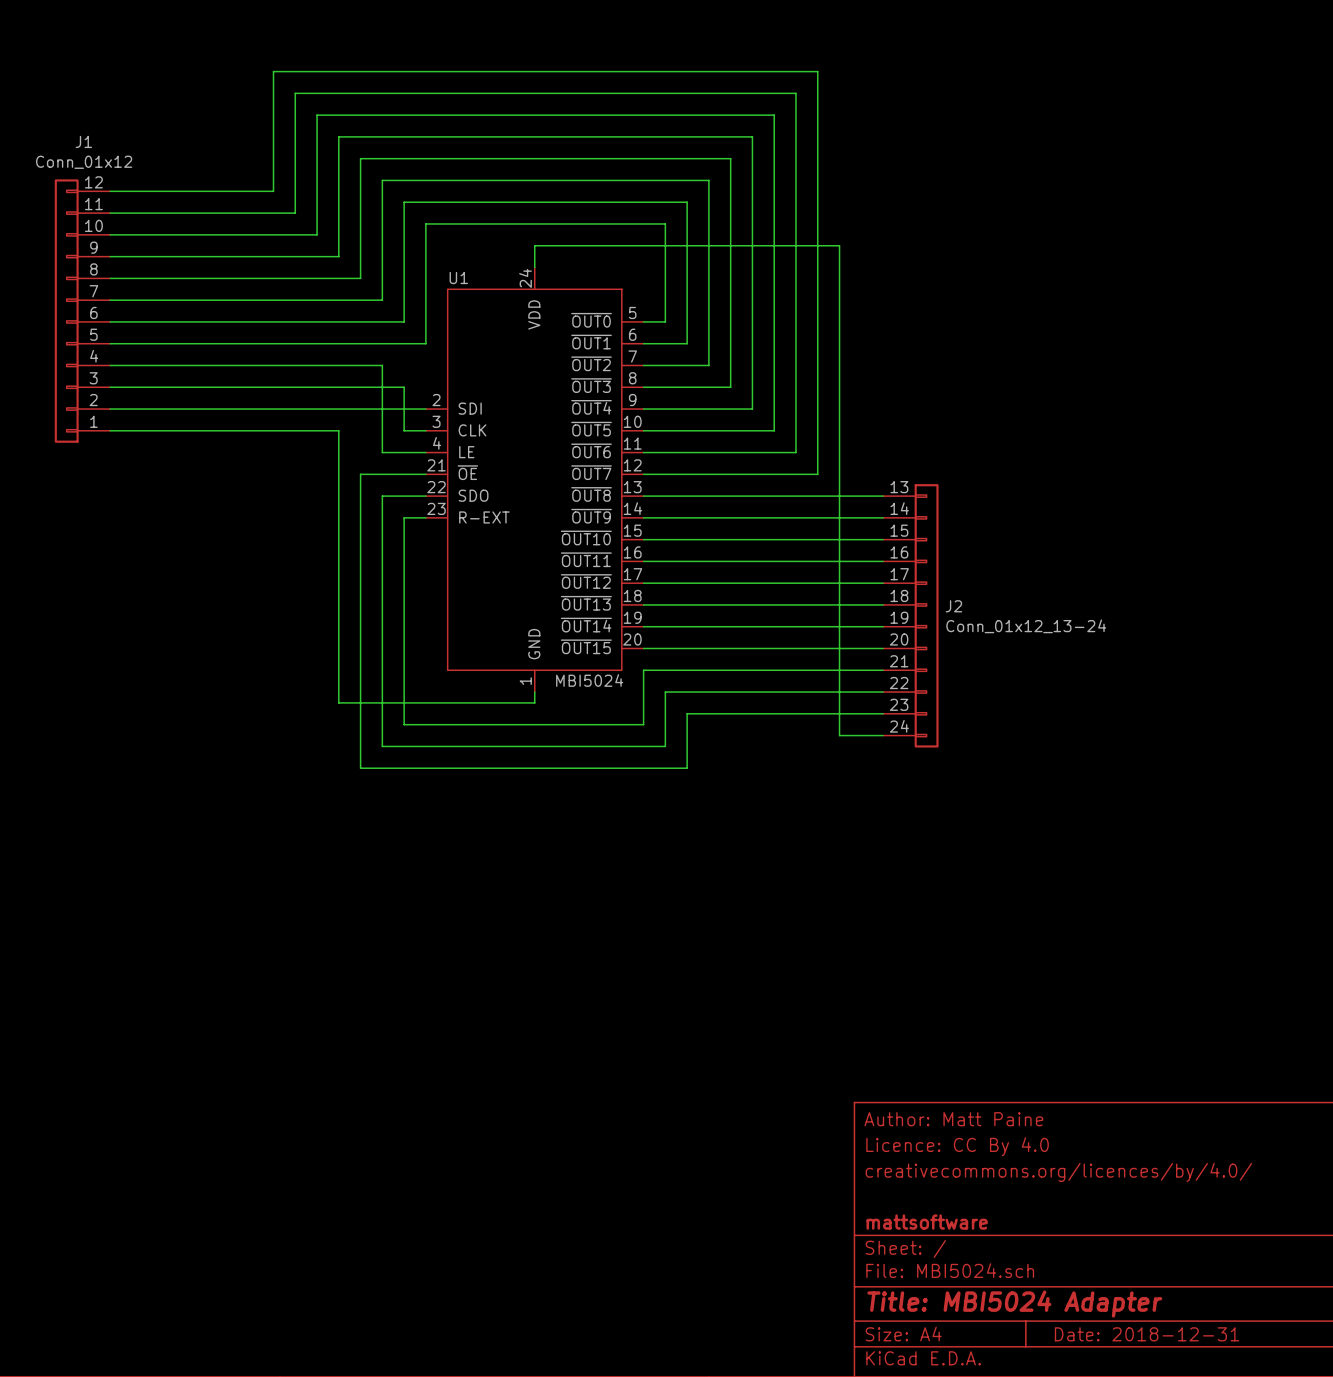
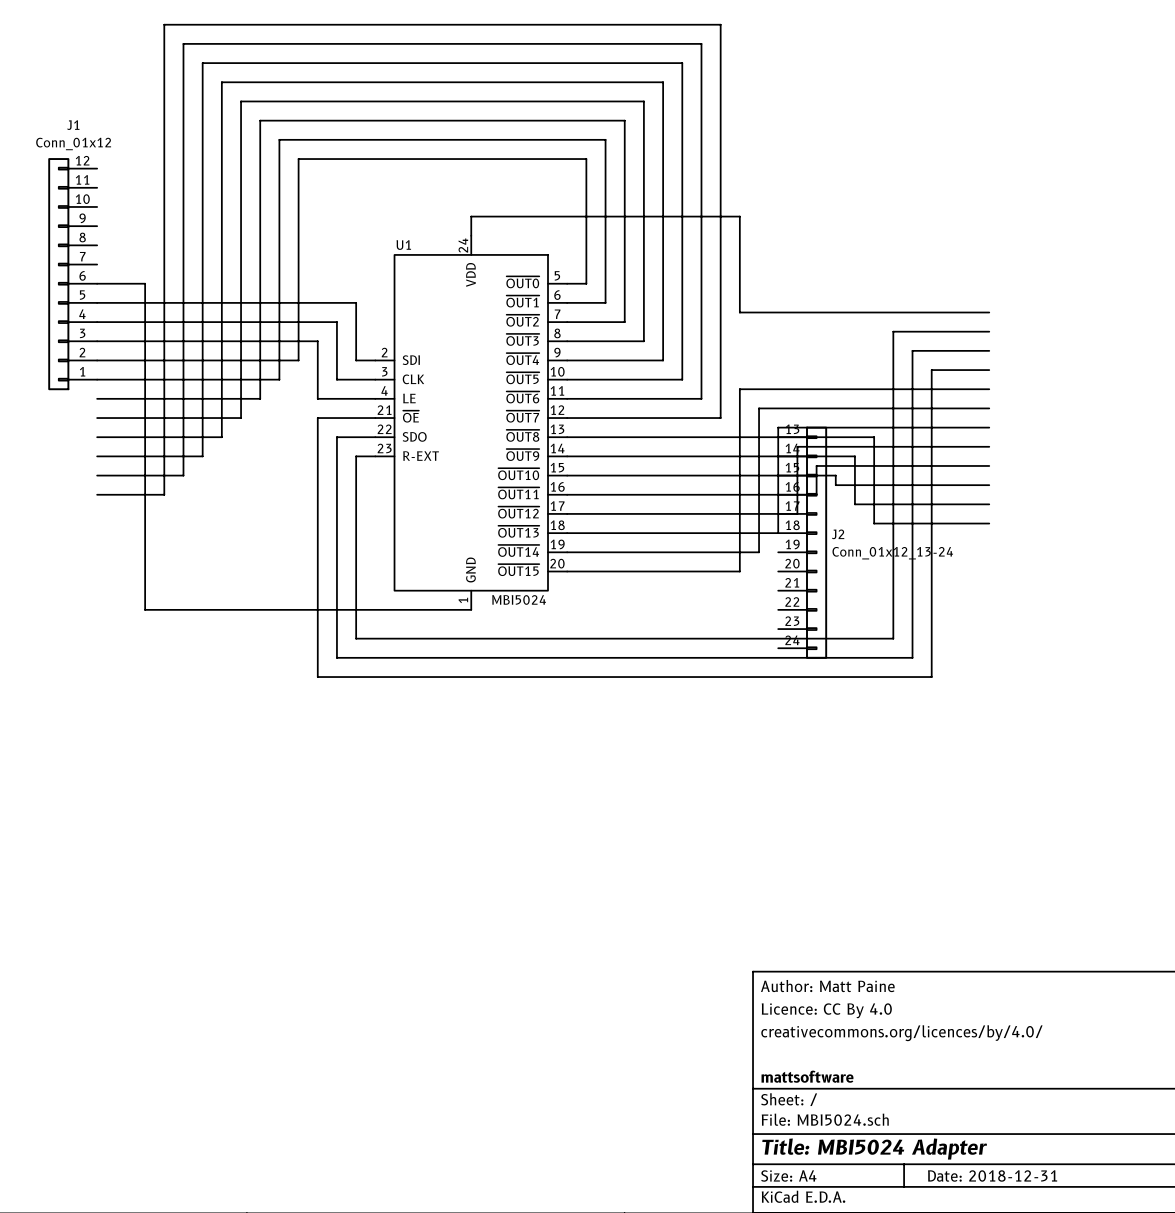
wire: (273, 71) (273, 115) -> (279, 101) (241, 101)
wire: none -> (241, 63) (202, 63) (202, 456) (97, 456)
wire: (774, 71) (817, 71) -> (97, 494) (164, 494) (164, 24) (720, 24) (720, 63)
wire: (295, 93) (295, 136) -> (260, 82) (221, 82) (221, 437) (97, 437)
wire: (752, 93) (795, 93) -> (663, 82) (663, 120)
wire: none -> (701, 82) (701, 43) (183, 43) (183, 475) (97, 475)
wire: (317, 115) (317, 158) -> (317, 139) (279, 139)
wire: (730, 115) (774, 115) -> (682, 63) (682, 101)
wire: none -> (643, 101) (643, 139)
wire: (338, 136) (338, 180) -> (298, 120) (260, 120)
wire: (708, 136) (752, 136) -> (624, 120) (624, 159)
wire: (360, 158) (360, 278) (110, 278) -> none
wire: (687, 158) (730, 158) -> (605, 139) (605, 178)
wire: (382, 180) (382, 300) (110, 300) -> (336, 159) (298, 159)
wire: (665, 180) (708, 180) -> (586, 159) (586, 197)
wire: (110, 191) (273, 191) -> (97, 418) (241, 418) (241, 168)
wire: (687, 202) (404, 202) (404, 321) (164, 321) -> none
wire: (110, 213) (295, 213) -> (97, 398) (260, 398) (260, 187)
wire: (665, 223) (425, 223) (425, 343) (404, 343) -> none
wire: (110, 234) (317, 234) -> (279, 379) (279, 206)
wire: (110, 256) (338, 256) -> none
wire: (839, 354) (839, 441) -> (739, 312) (989, 312)
wire: (360, 387) (404, 387) -> (356, 302) (356, 341)
wire: none -> (317, 341) (317, 398) (336, 398)
wire: (338, 409) (404, 409) (404, 430) -> (298, 360) (298, 226)
wire: (317, 430) (338, 430) (338, 702) (534, 702) (534, 692) -> (145, 283) (145, 609) (471, 609)
wire: (382, 430) (382, 452) -> (336, 379) (356, 379)
wire: none -> (739, 389) (989, 389)
wire: none -> (989, 427) (778, 427) (778, 533)
wire: none -> (778, 437) (874, 437) (874, 523) (989, 523)
wire: none -> (989, 446) (797, 446) (797, 513) (778, 513)
wire: none -> (778, 456) (854, 456) (854, 504) (989, 504)
wire: none -> (989, 465) (816, 465) (816, 494) (778, 494)
wire: none -> (778, 475) (835, 475) (835, 485) (989, 485)
wire: (861, 626) (883, 626) -> (759, 552) (759, 408) (989, 408)
wire: (883, 648) (839, 648) (839, 735) (883, 735) -> none
wire: (883, 670) (643, 670) (643, 724) -> (989, 331) (893, 331) (893, 638) (567, 638)
wire: (883, 692) (665, 692) (665, 746) -> (989, 350) (912, 350) (912, 657) (586, 657)
wire: (883, 713) (687, 713) (687, 768) -> (989, 370) (931, 370) (931, 677) (605, 677)

